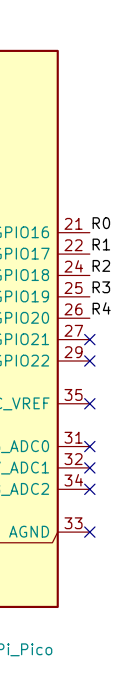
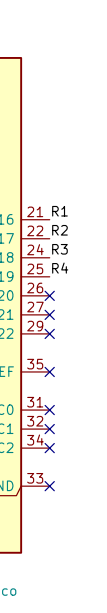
label: R0 (101, 223) -> R1 (59, 211)
label: R1 (101, 244) -> R2 (59, 230)
label: R2 (101, 265) -> R3 (59, 249)
label: R3 (101, 287) -> R4 (60, 268)
label: R4 (101, 308) -> none
no-connect mark: none -> (49, 295)

